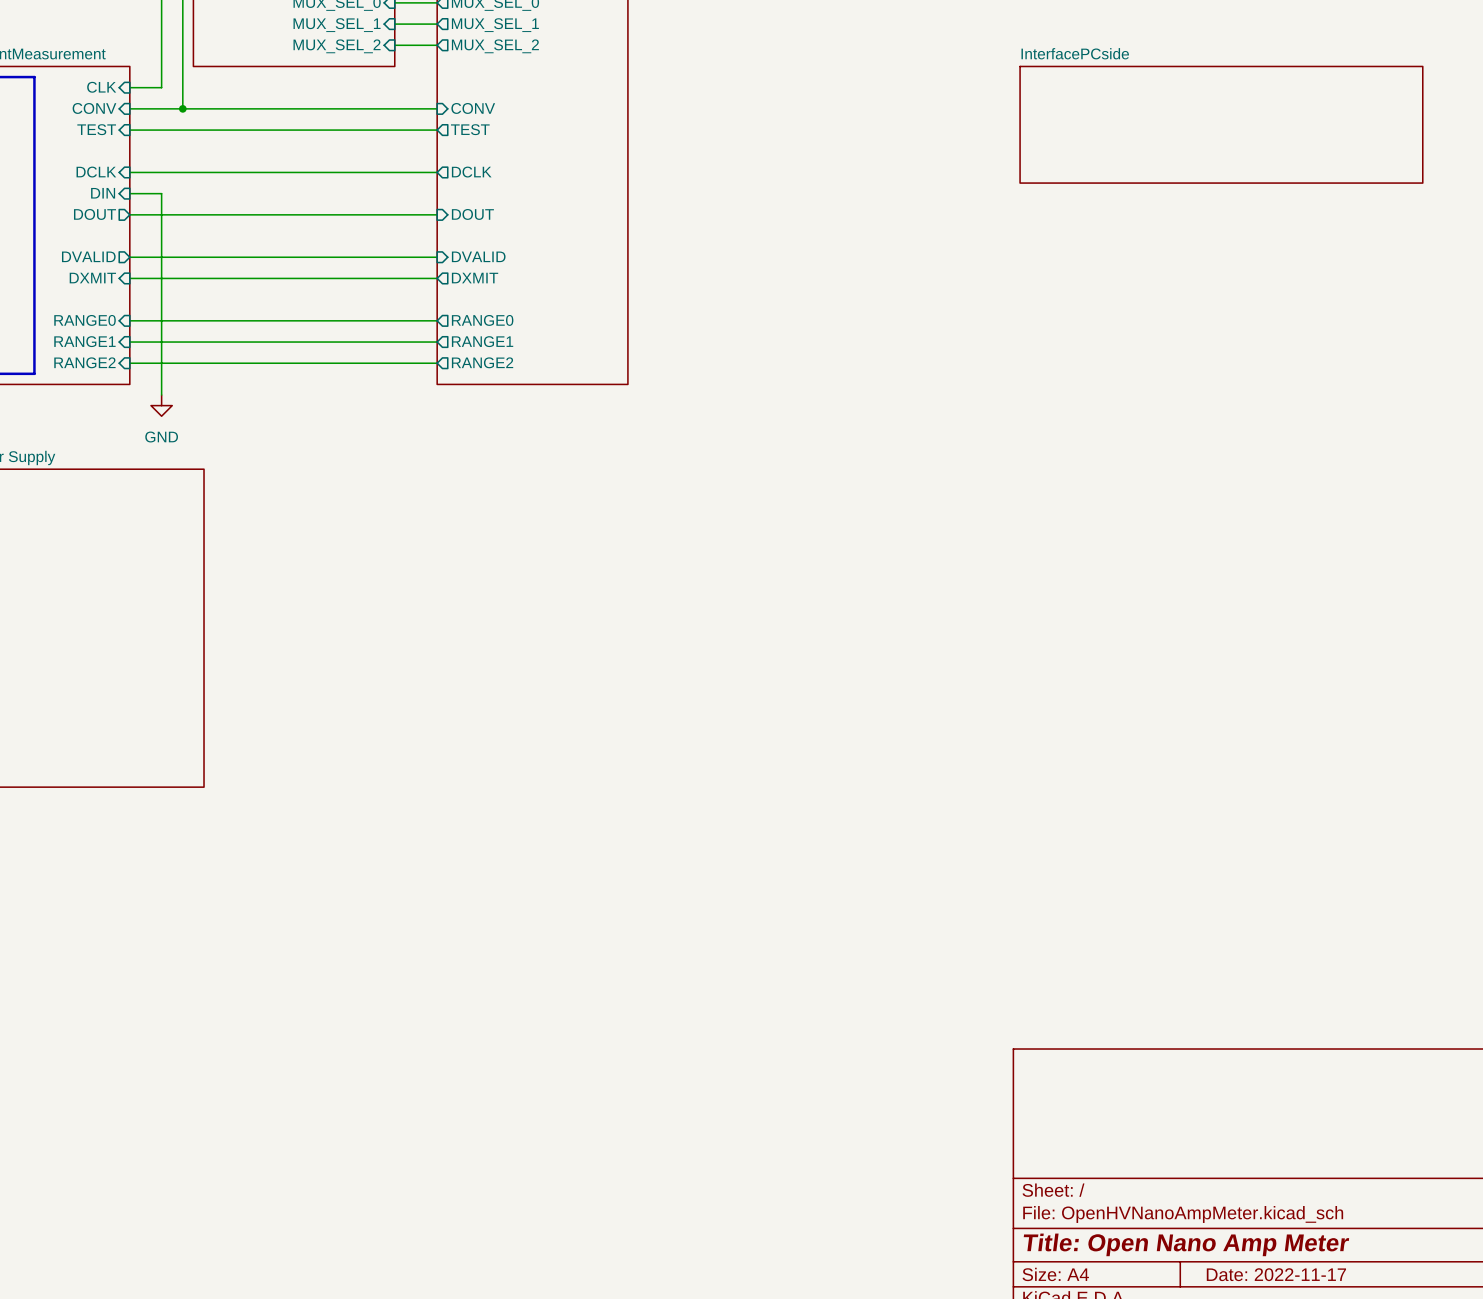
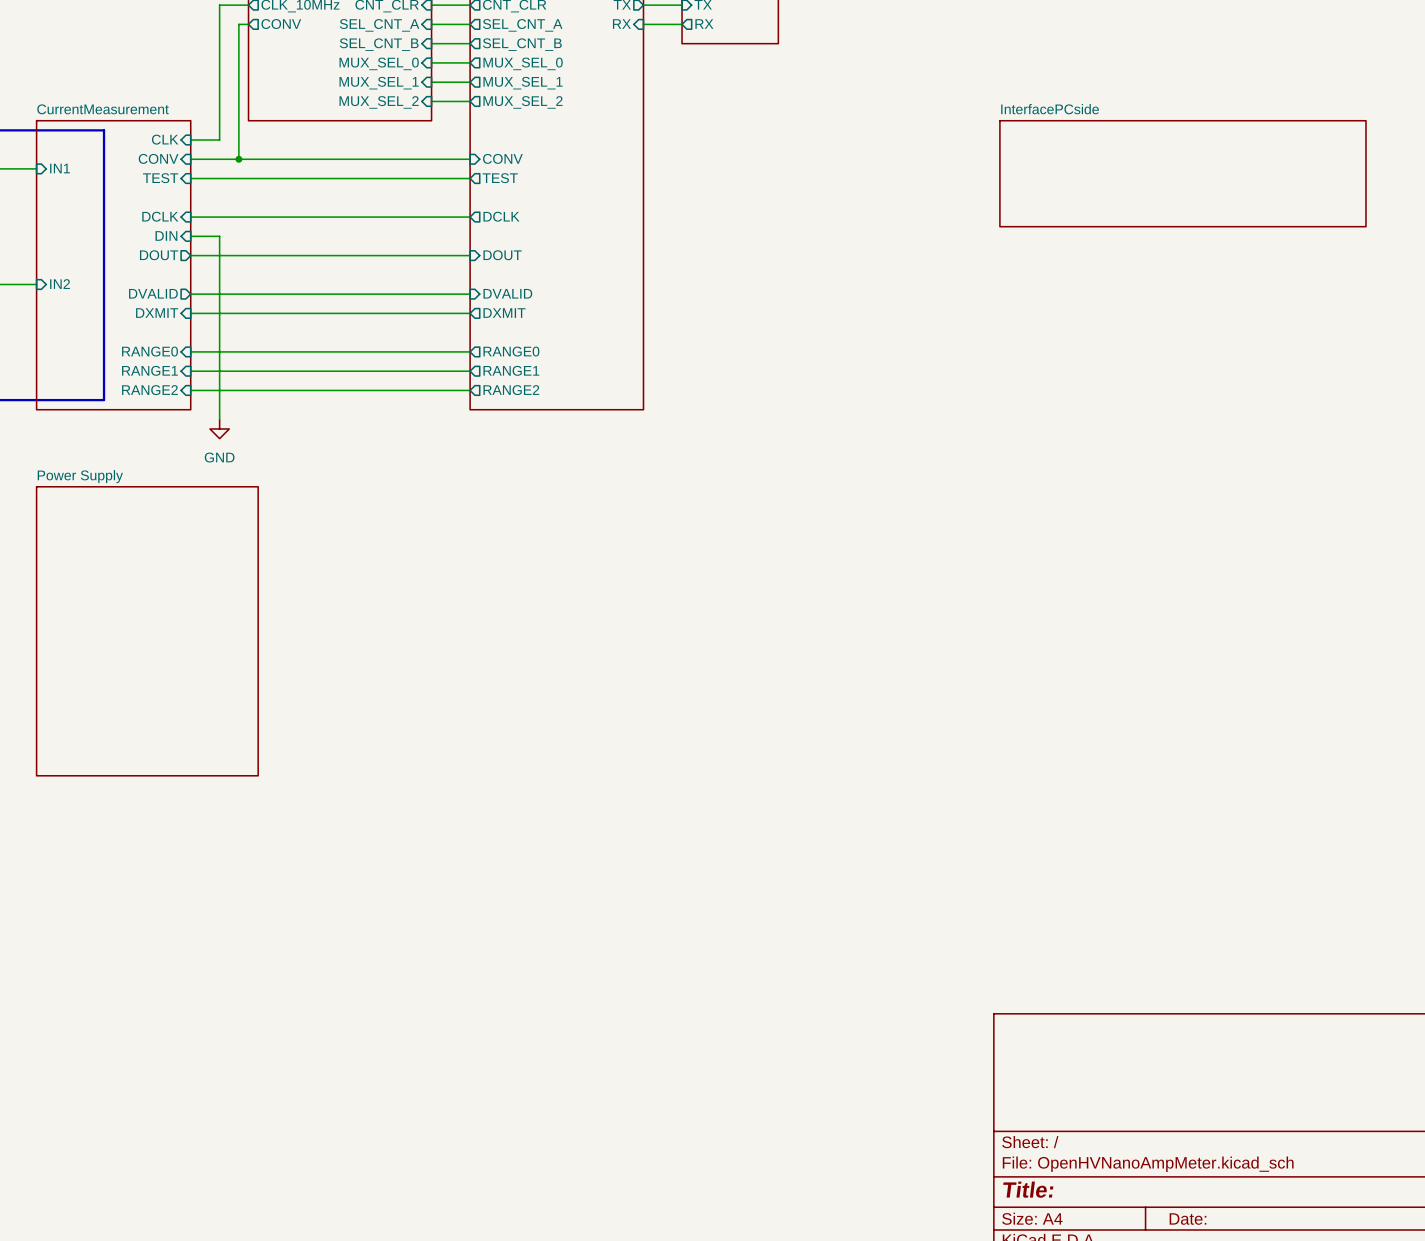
title block: Title: Open Nano Amp Meter (1186, 1244) -> Title: (1028, 1189)
title block: Date: 2022-11-17 (1276, 1274) -> Date: (1188, 1219)

